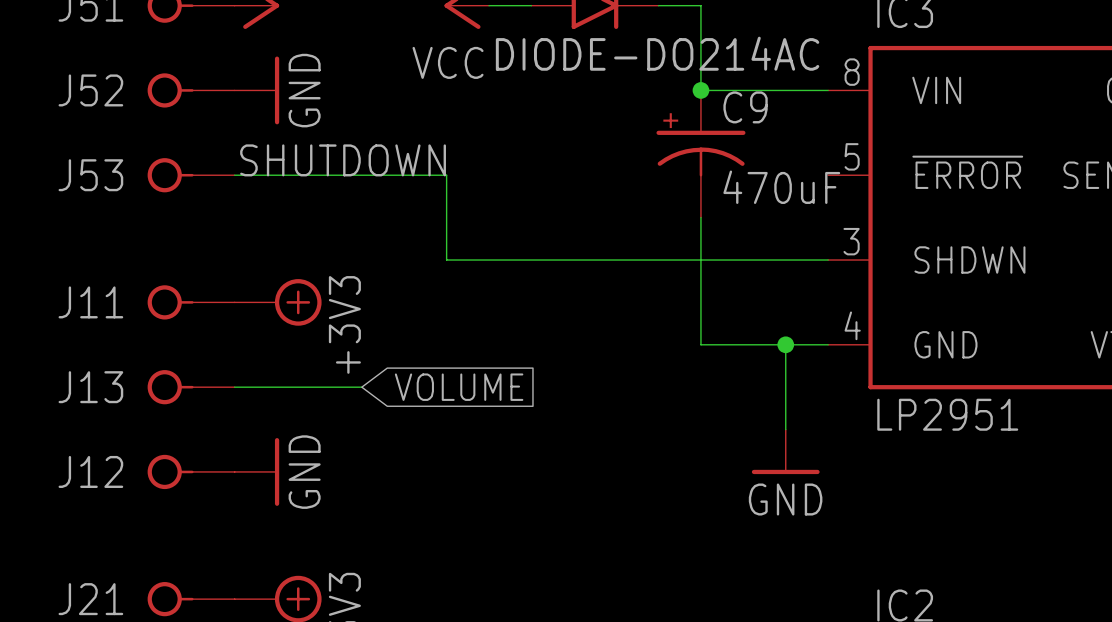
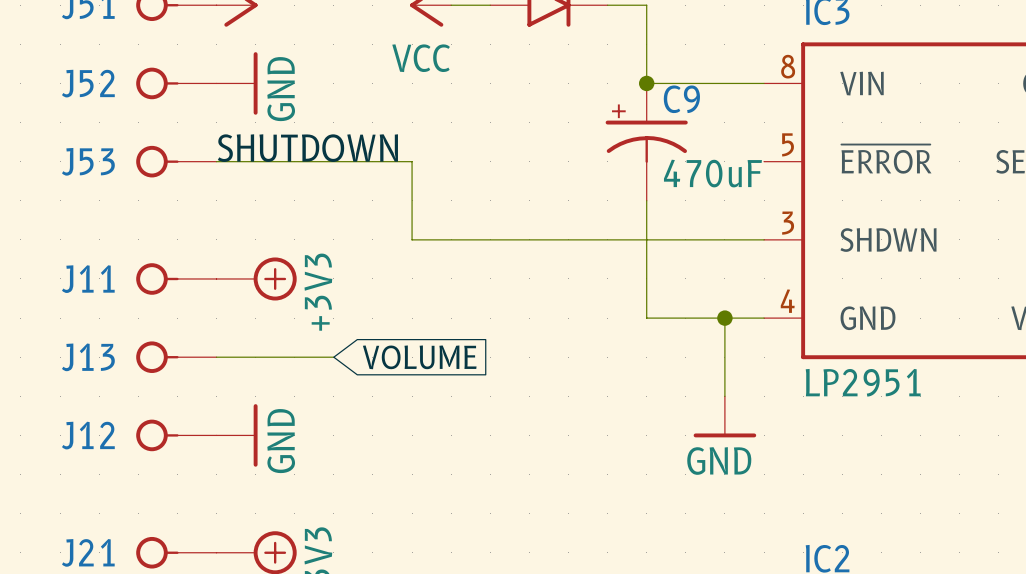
part value: DIODE-DO214AC (657, 53) -> none

